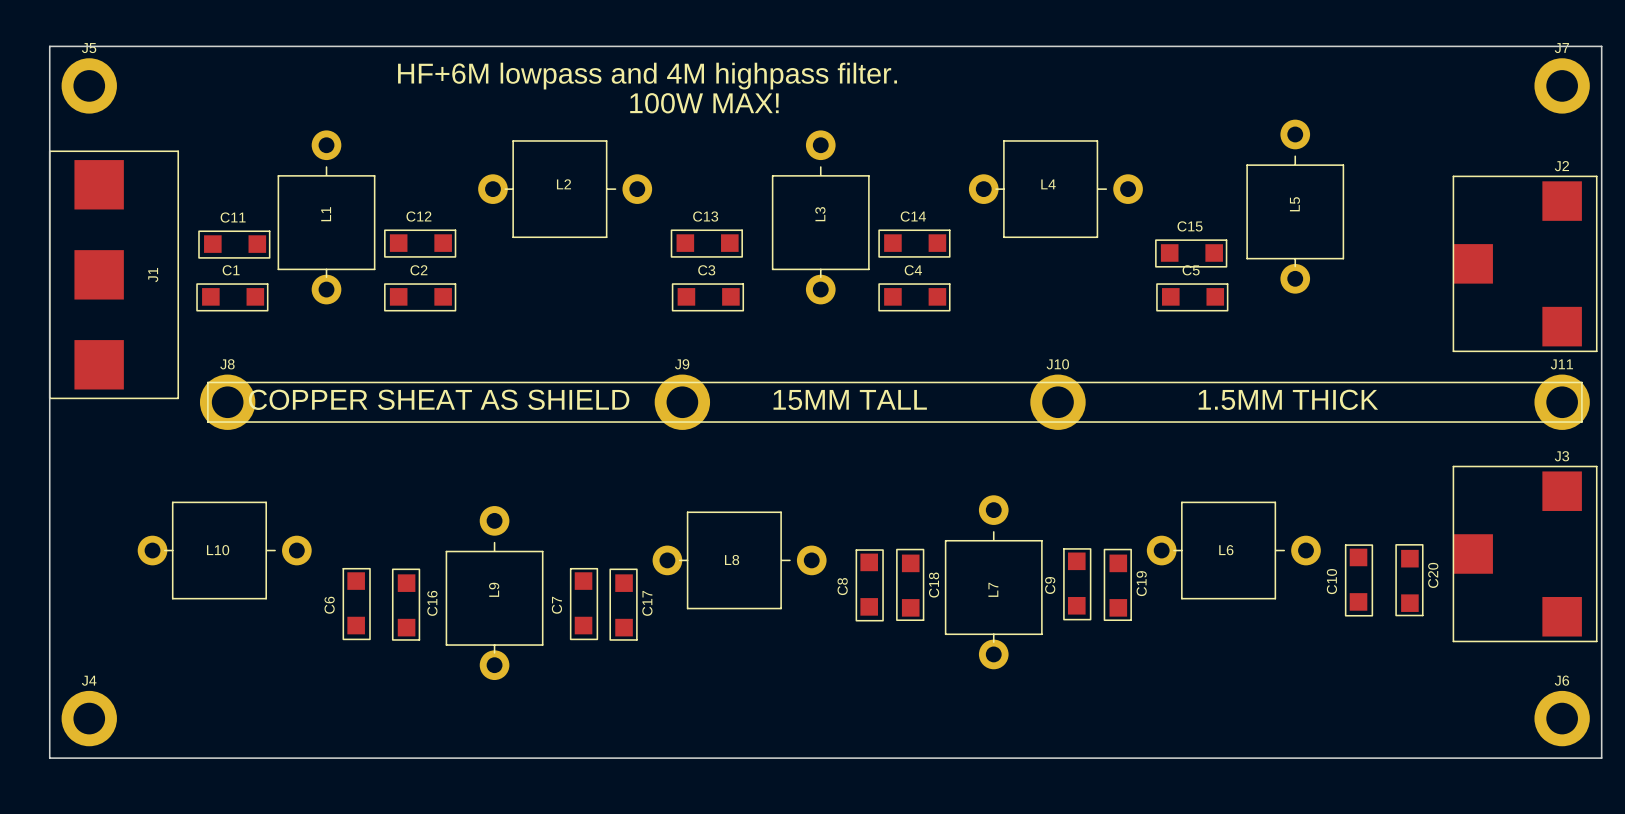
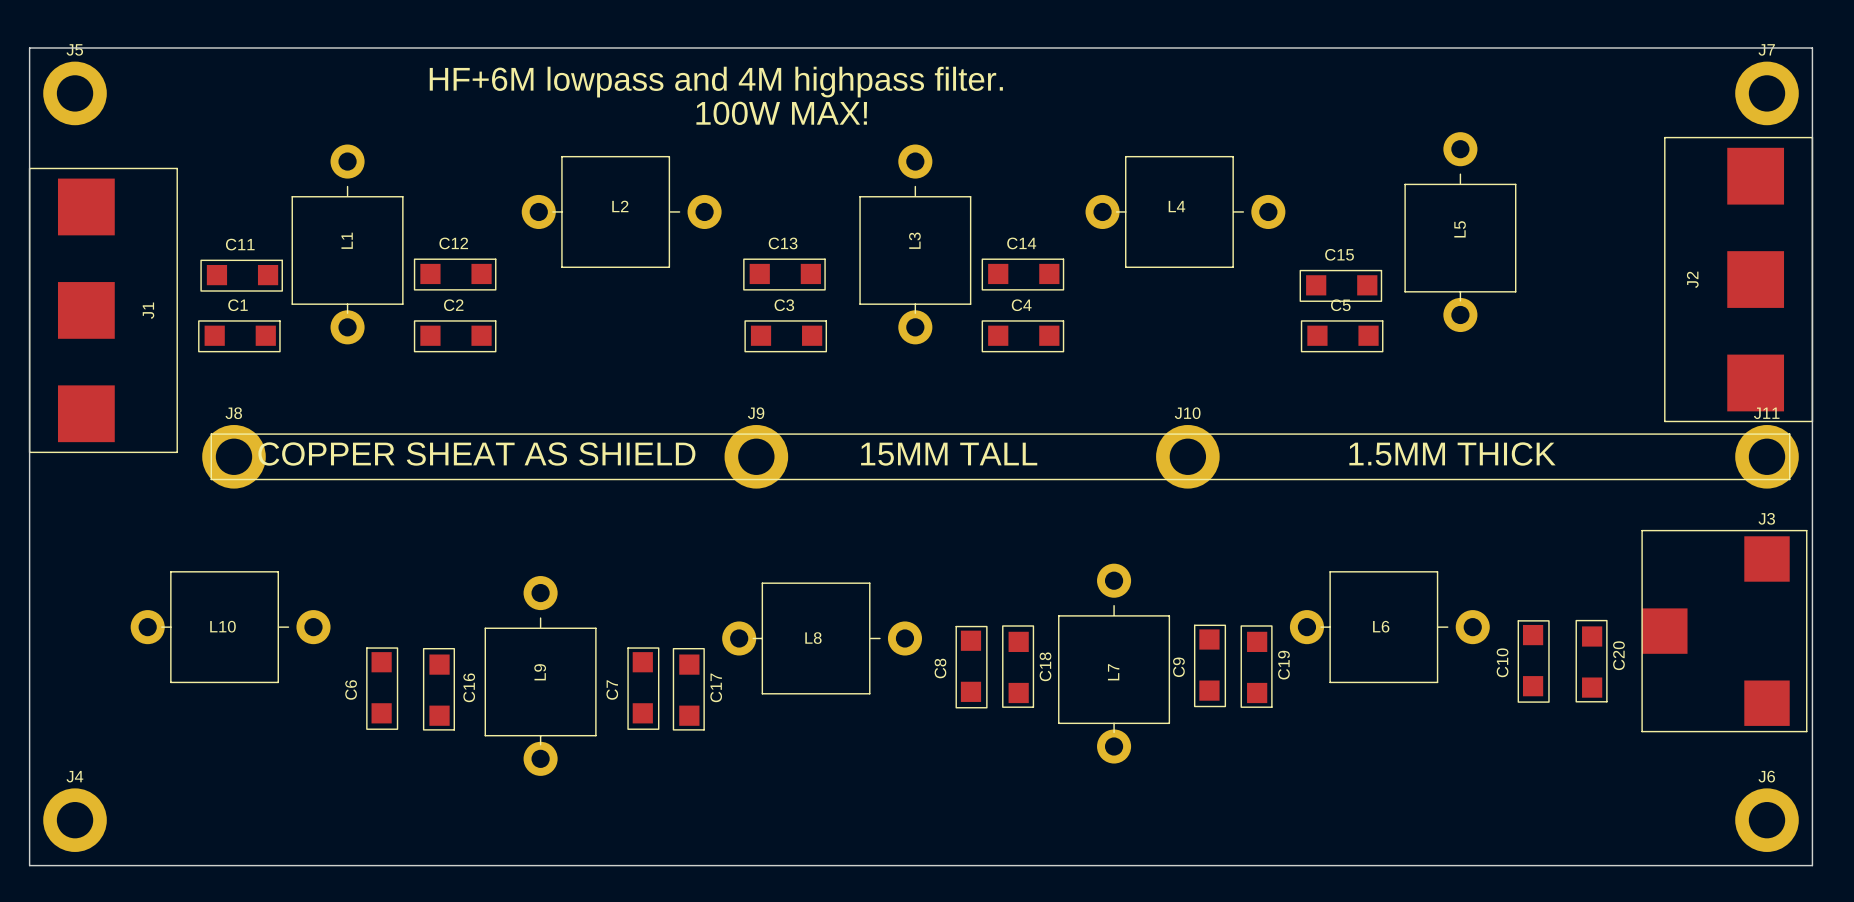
J2 name position: J2 (1561, 166) -> J2 (1692, 279)
J2 footprint: [1452, 175, 1598, 352] -> [1664, 136, 1814, 423]

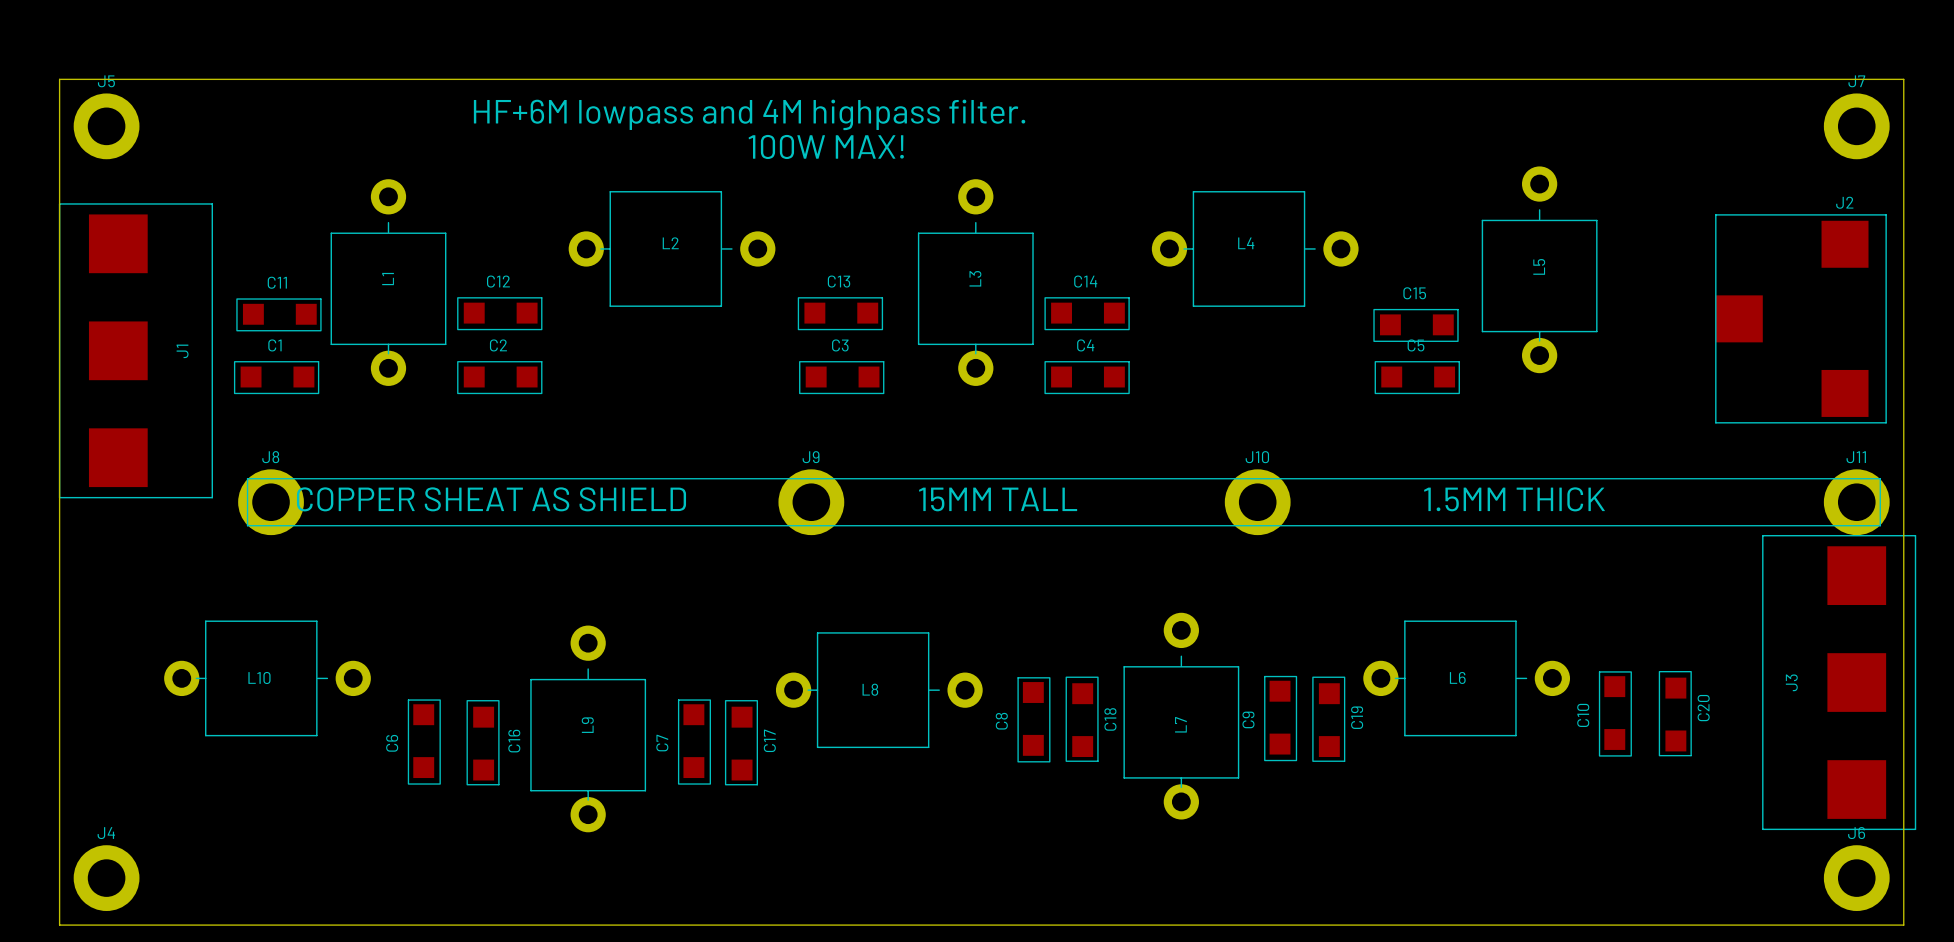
J2 footprint: [1664, 136, 1814, 423] -> [1715, 214, 1887, 424]
J2 name position: J2 (1692, 279) -> J2 (1844, 202)
J3 name position: J3 (1766, 518) -> J3 (1791, 682)
J3 footprint: [1641, 529, 1808, 733] -> [1762, 534, 1917, 831]

